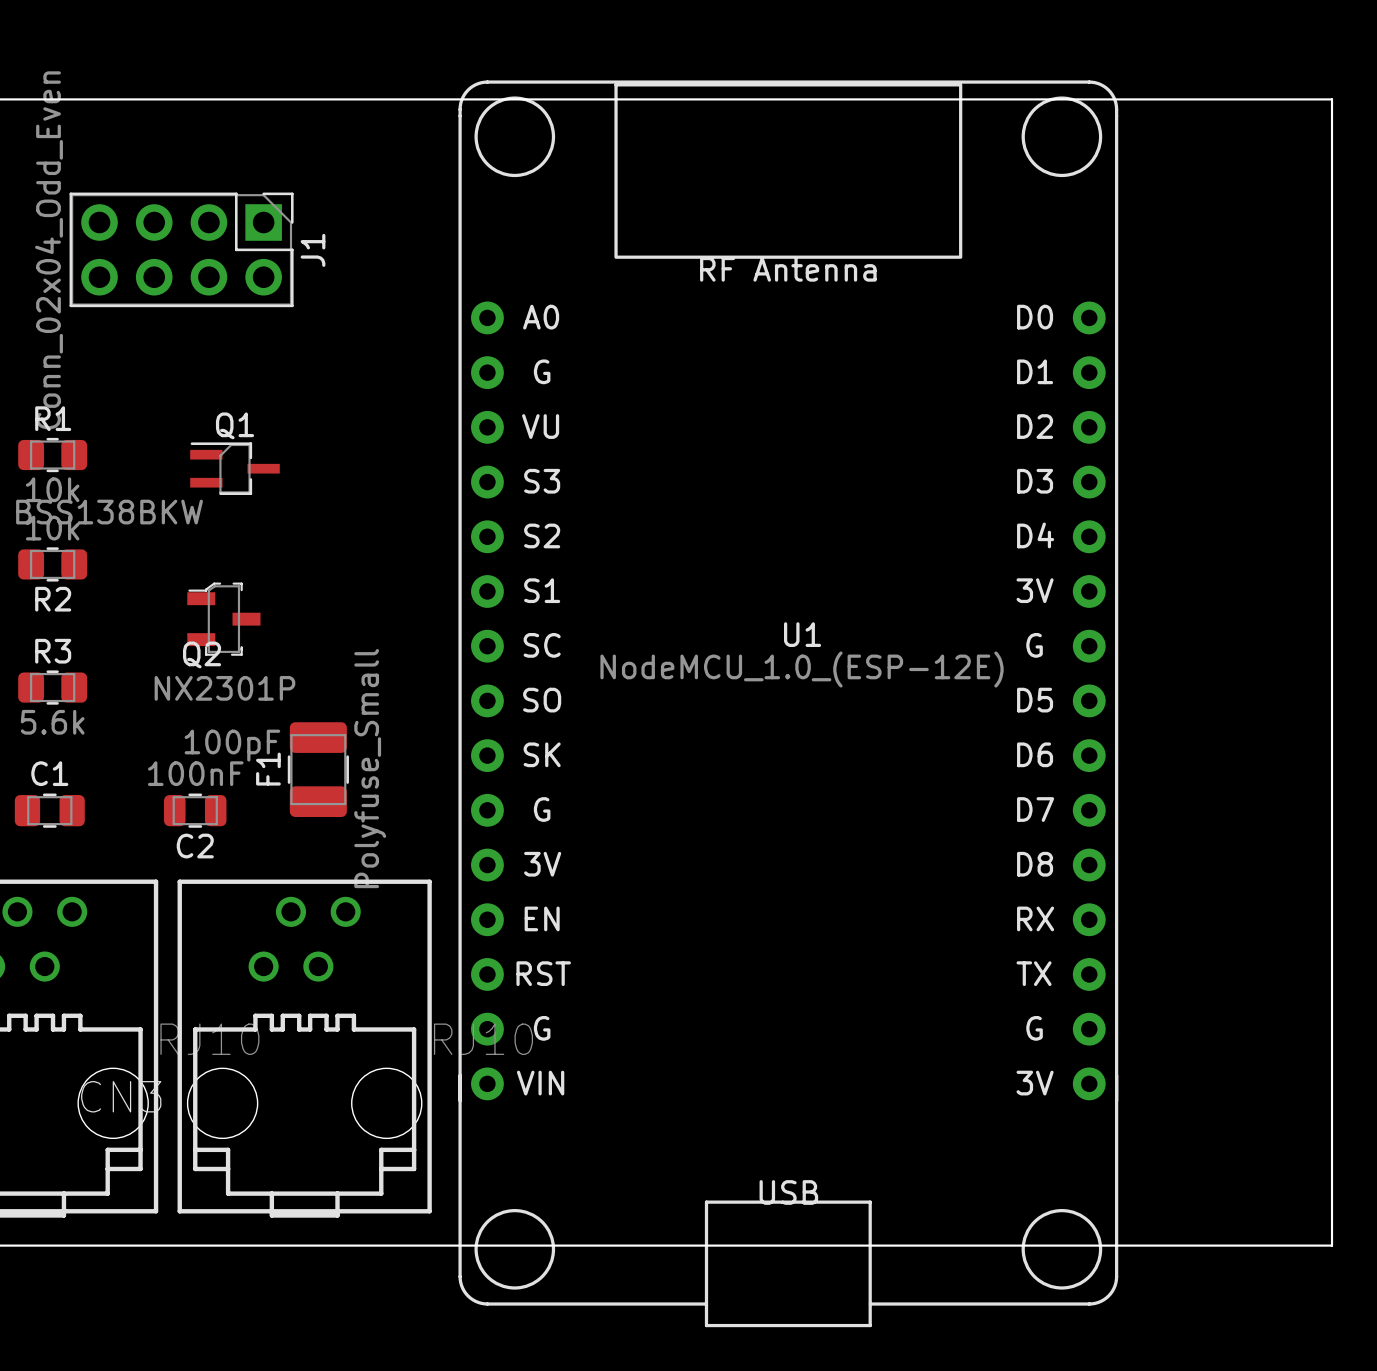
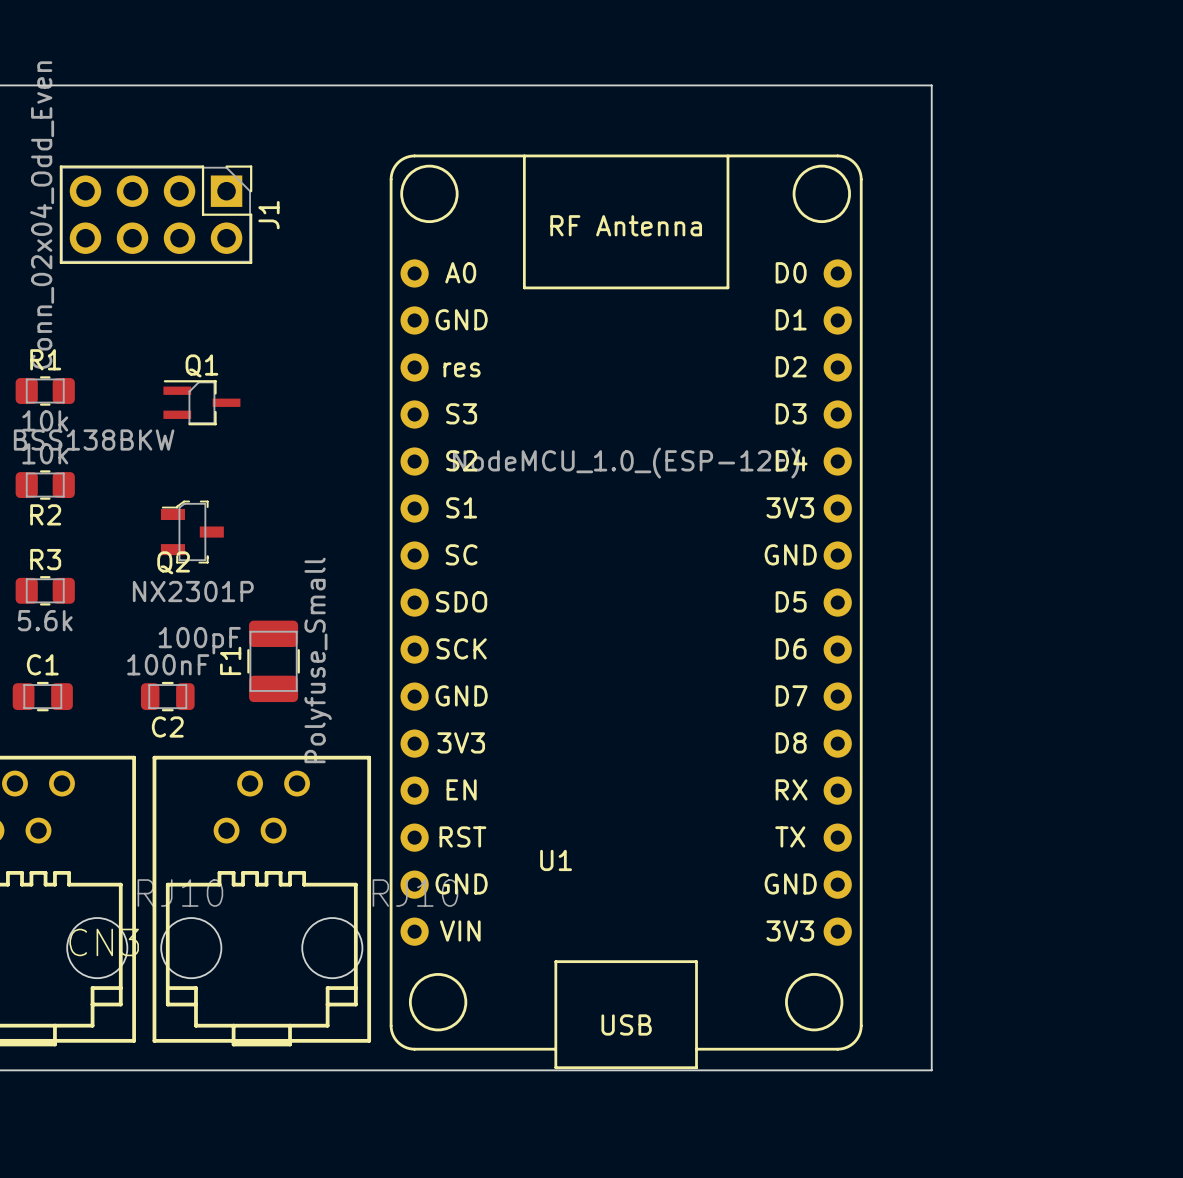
U1 footprint: [458, 80, 1119, 1328] -> [389, 154, 863, 1070]
board edge: (1084, 99) (1332, 99) (1332, 1245) (1084, 1245) -> (931, 85) (931, 1070)
U1 name position: U1 (802, 634) -> U1 (556, 860)
U1 value position: NodeMCU_1.0_(ESP-12E) (802, 669) -> NodeMCU_1.0_(ESP-12E) (626, 463)

